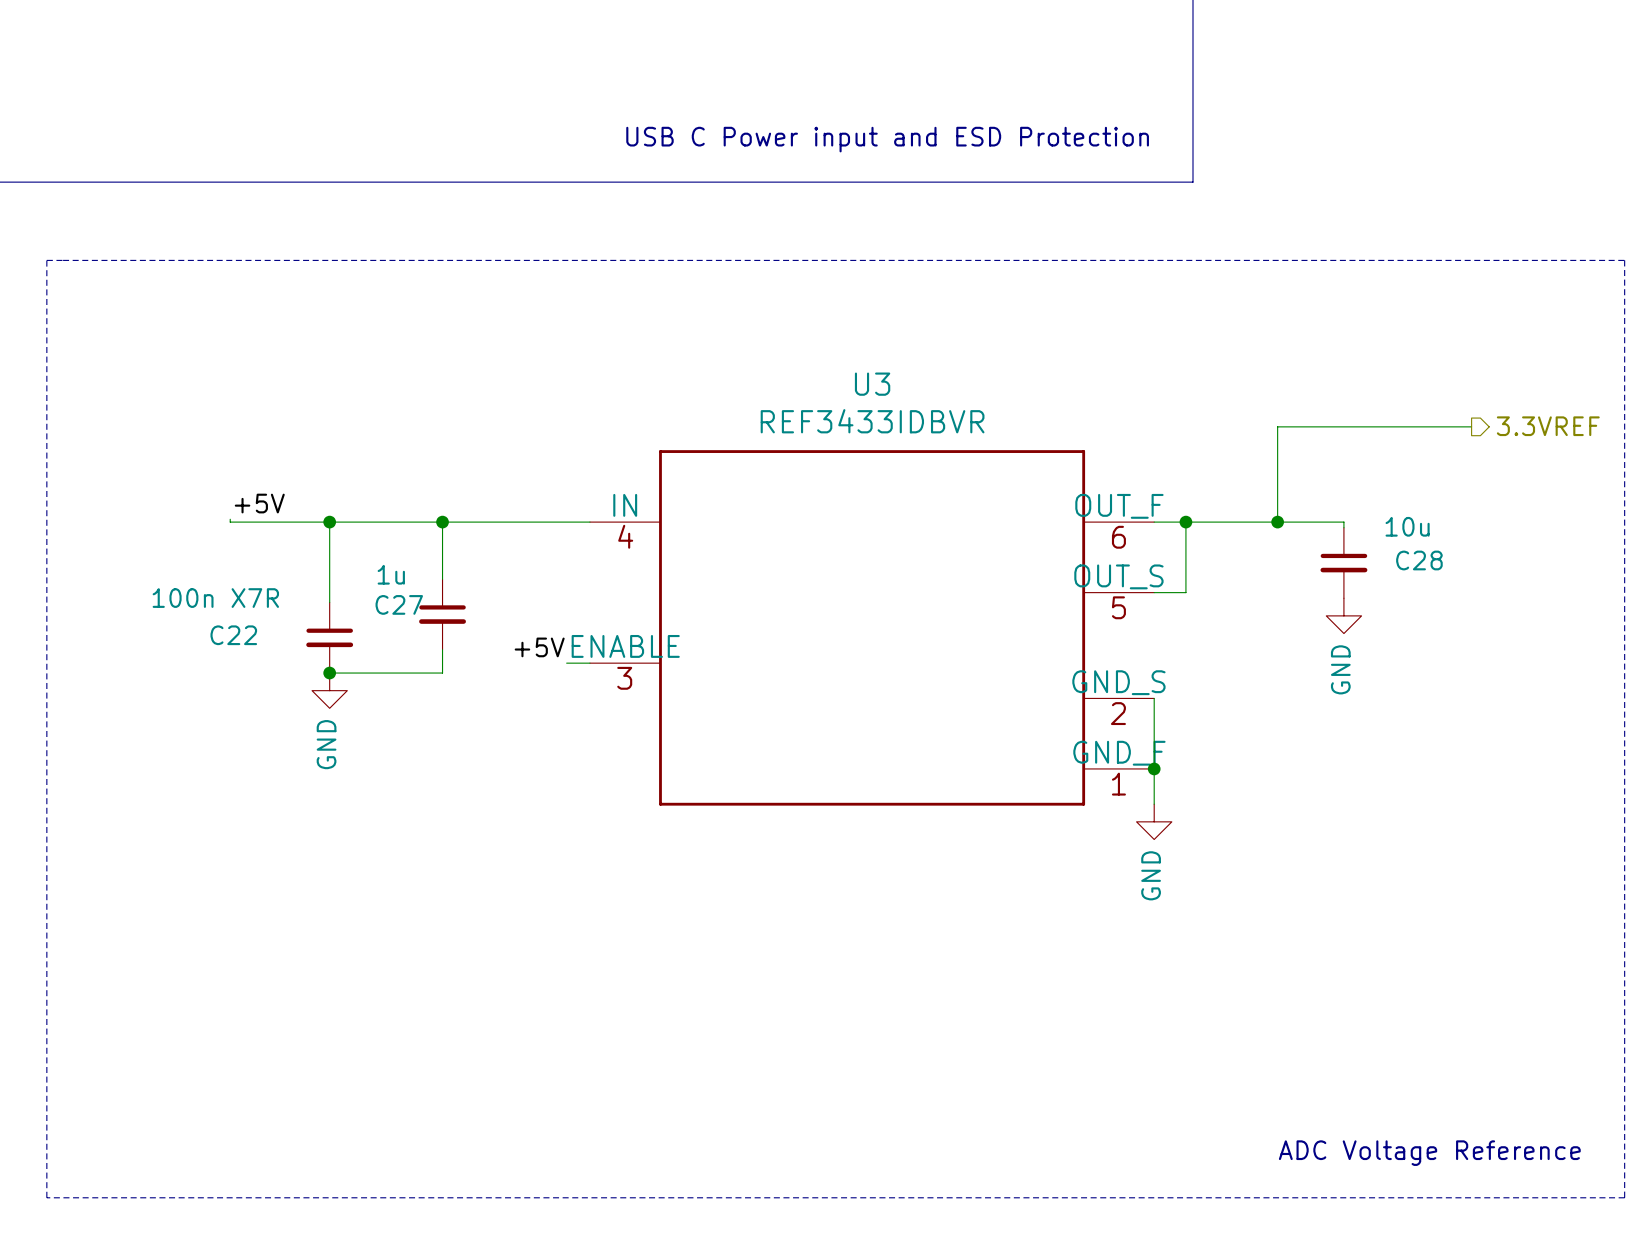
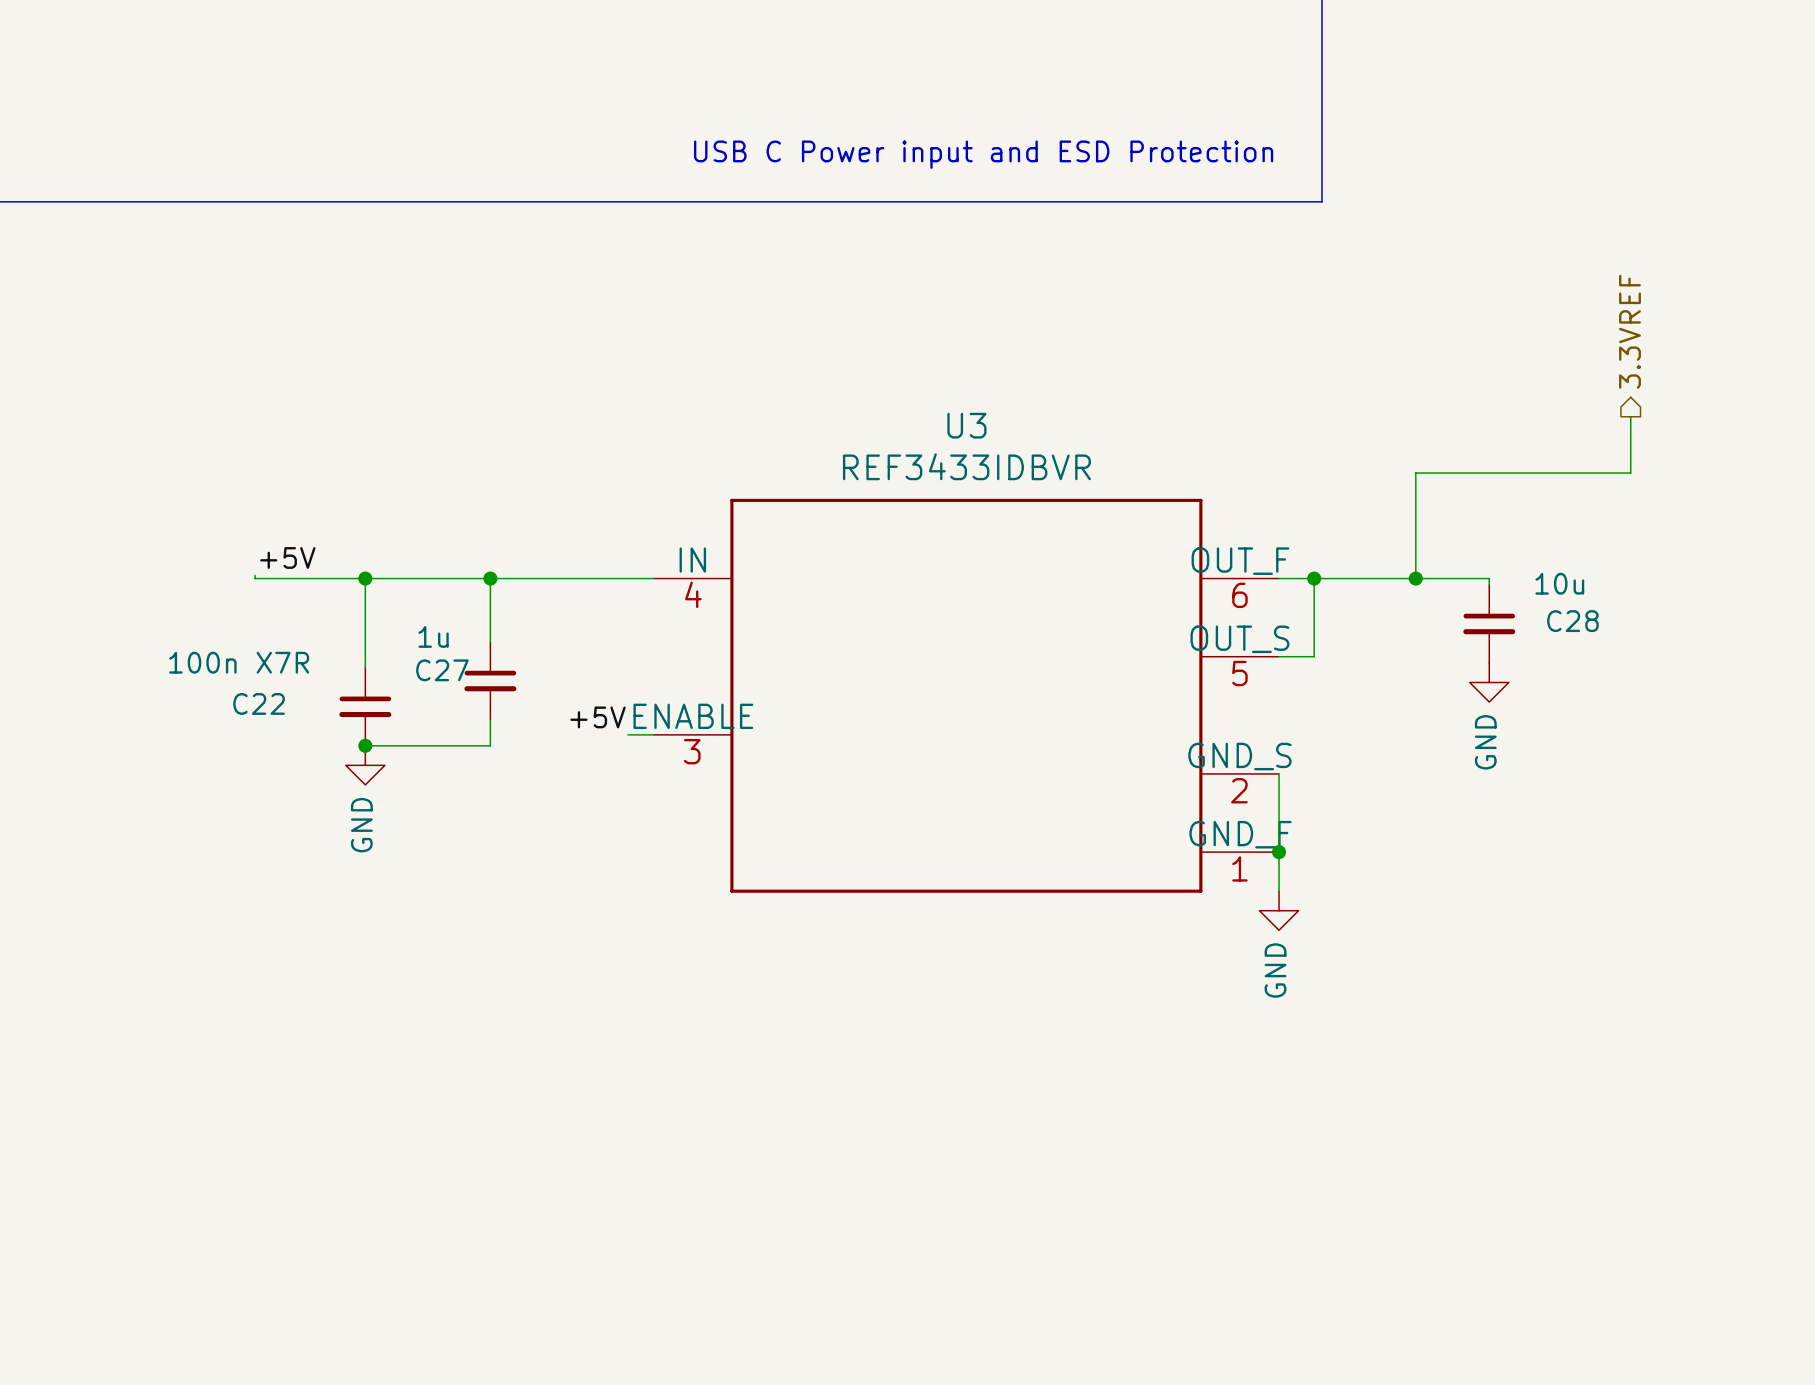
line: (46, 260) (1624, 260) (1624, 1197) (46, 1197) (46, 260) -> none
wire: none -> (1630, 416) (1630, 473)
hierarchical label rotation: 0° (1548, 426) -> 90° counterclockwise (1630, 331)
hierarchical label position: 3.3VREF (1548, 426) -> 3.3VREF (1630, 331)
text: ADC Voltage Reference (1429, 1153) -> none

